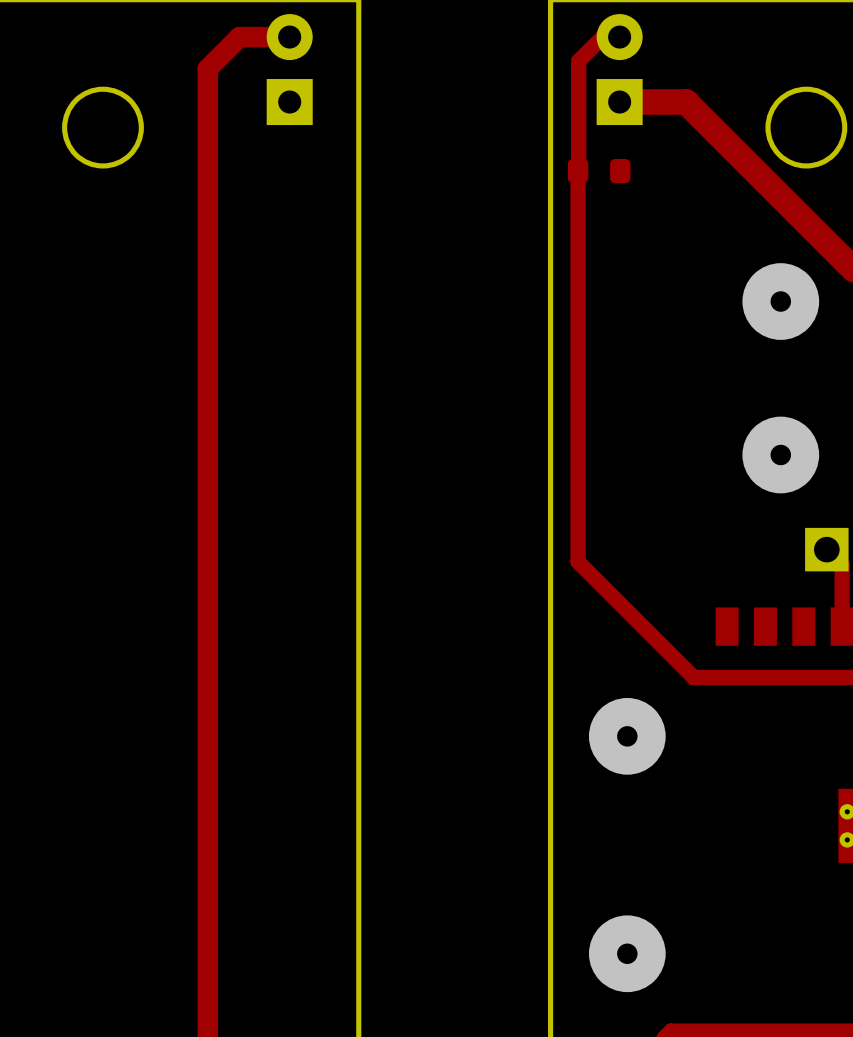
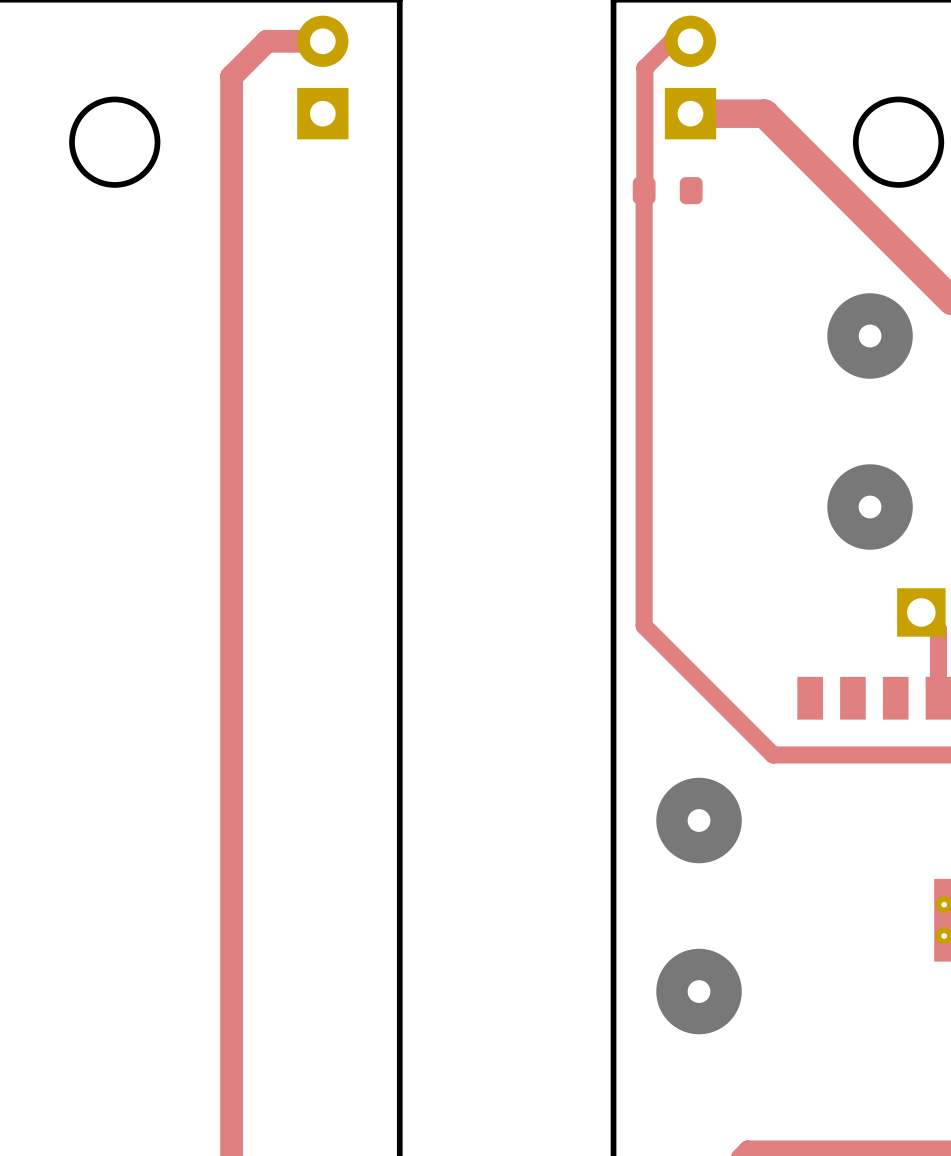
via position: (627, 953) -> (699, 991)

